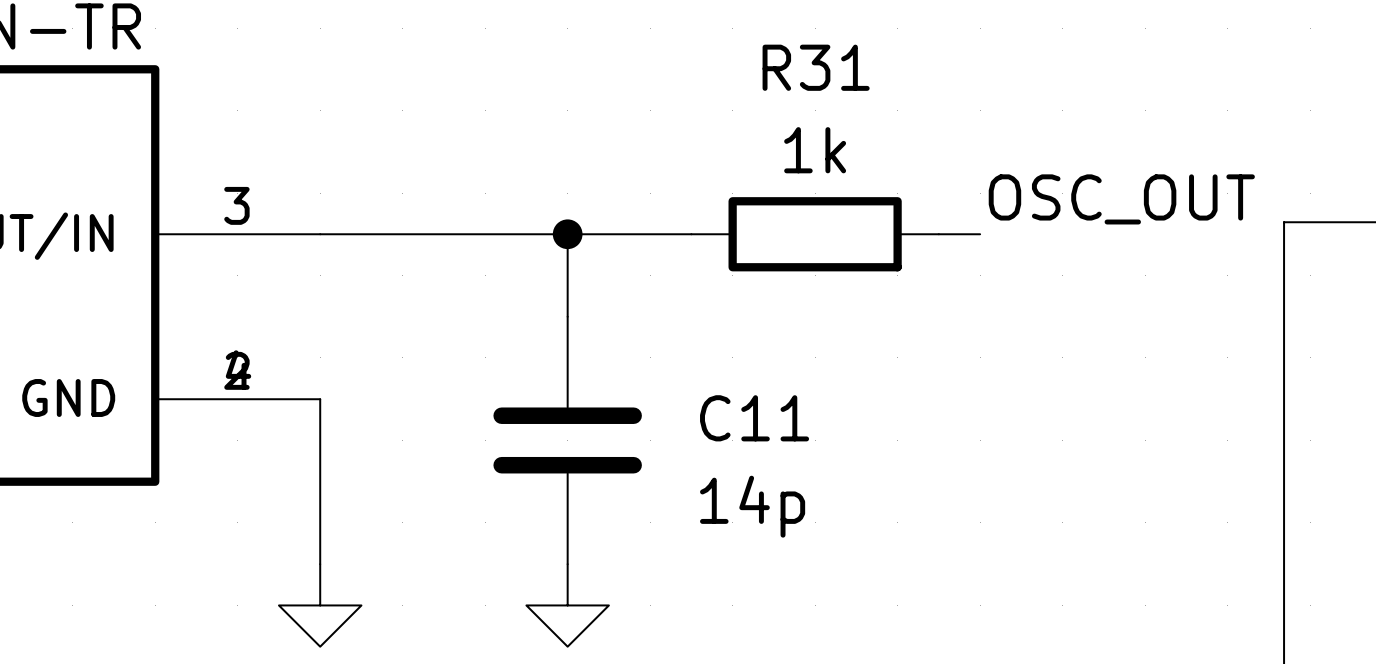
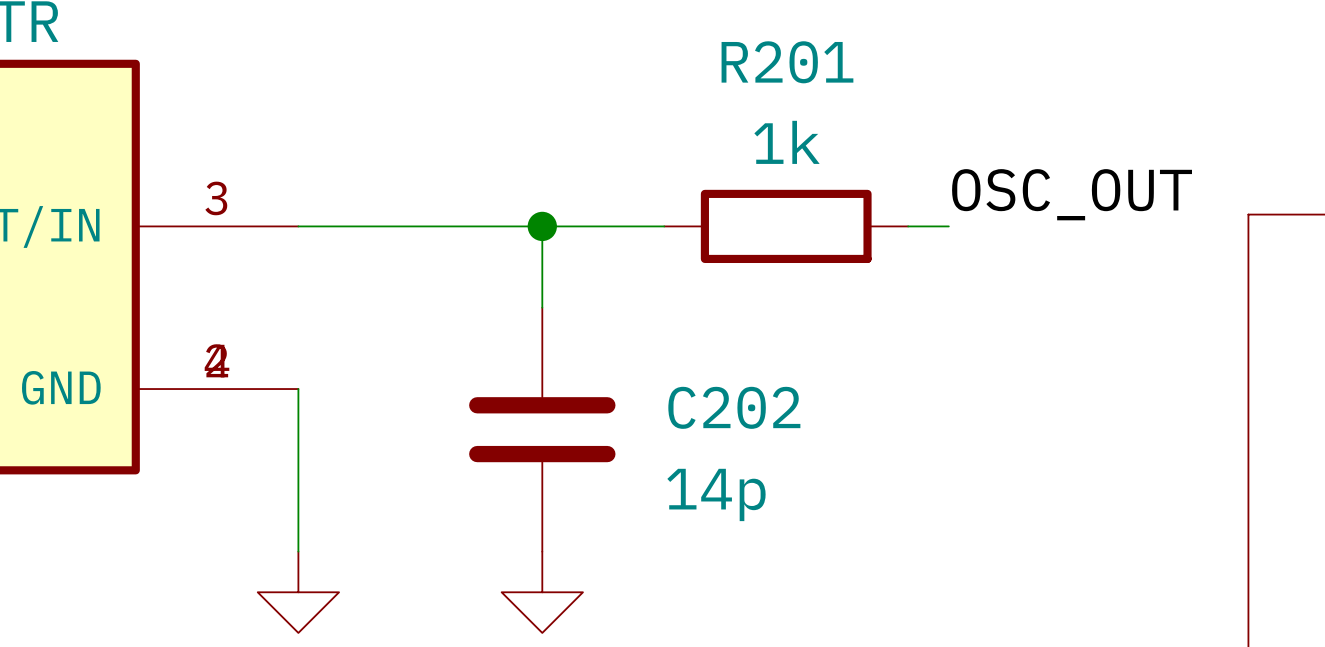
R31 name: R31 (816, 67) -> R201 (787, 62)
C11 name: C11 (754, 418) -> C202 (734, 407)

